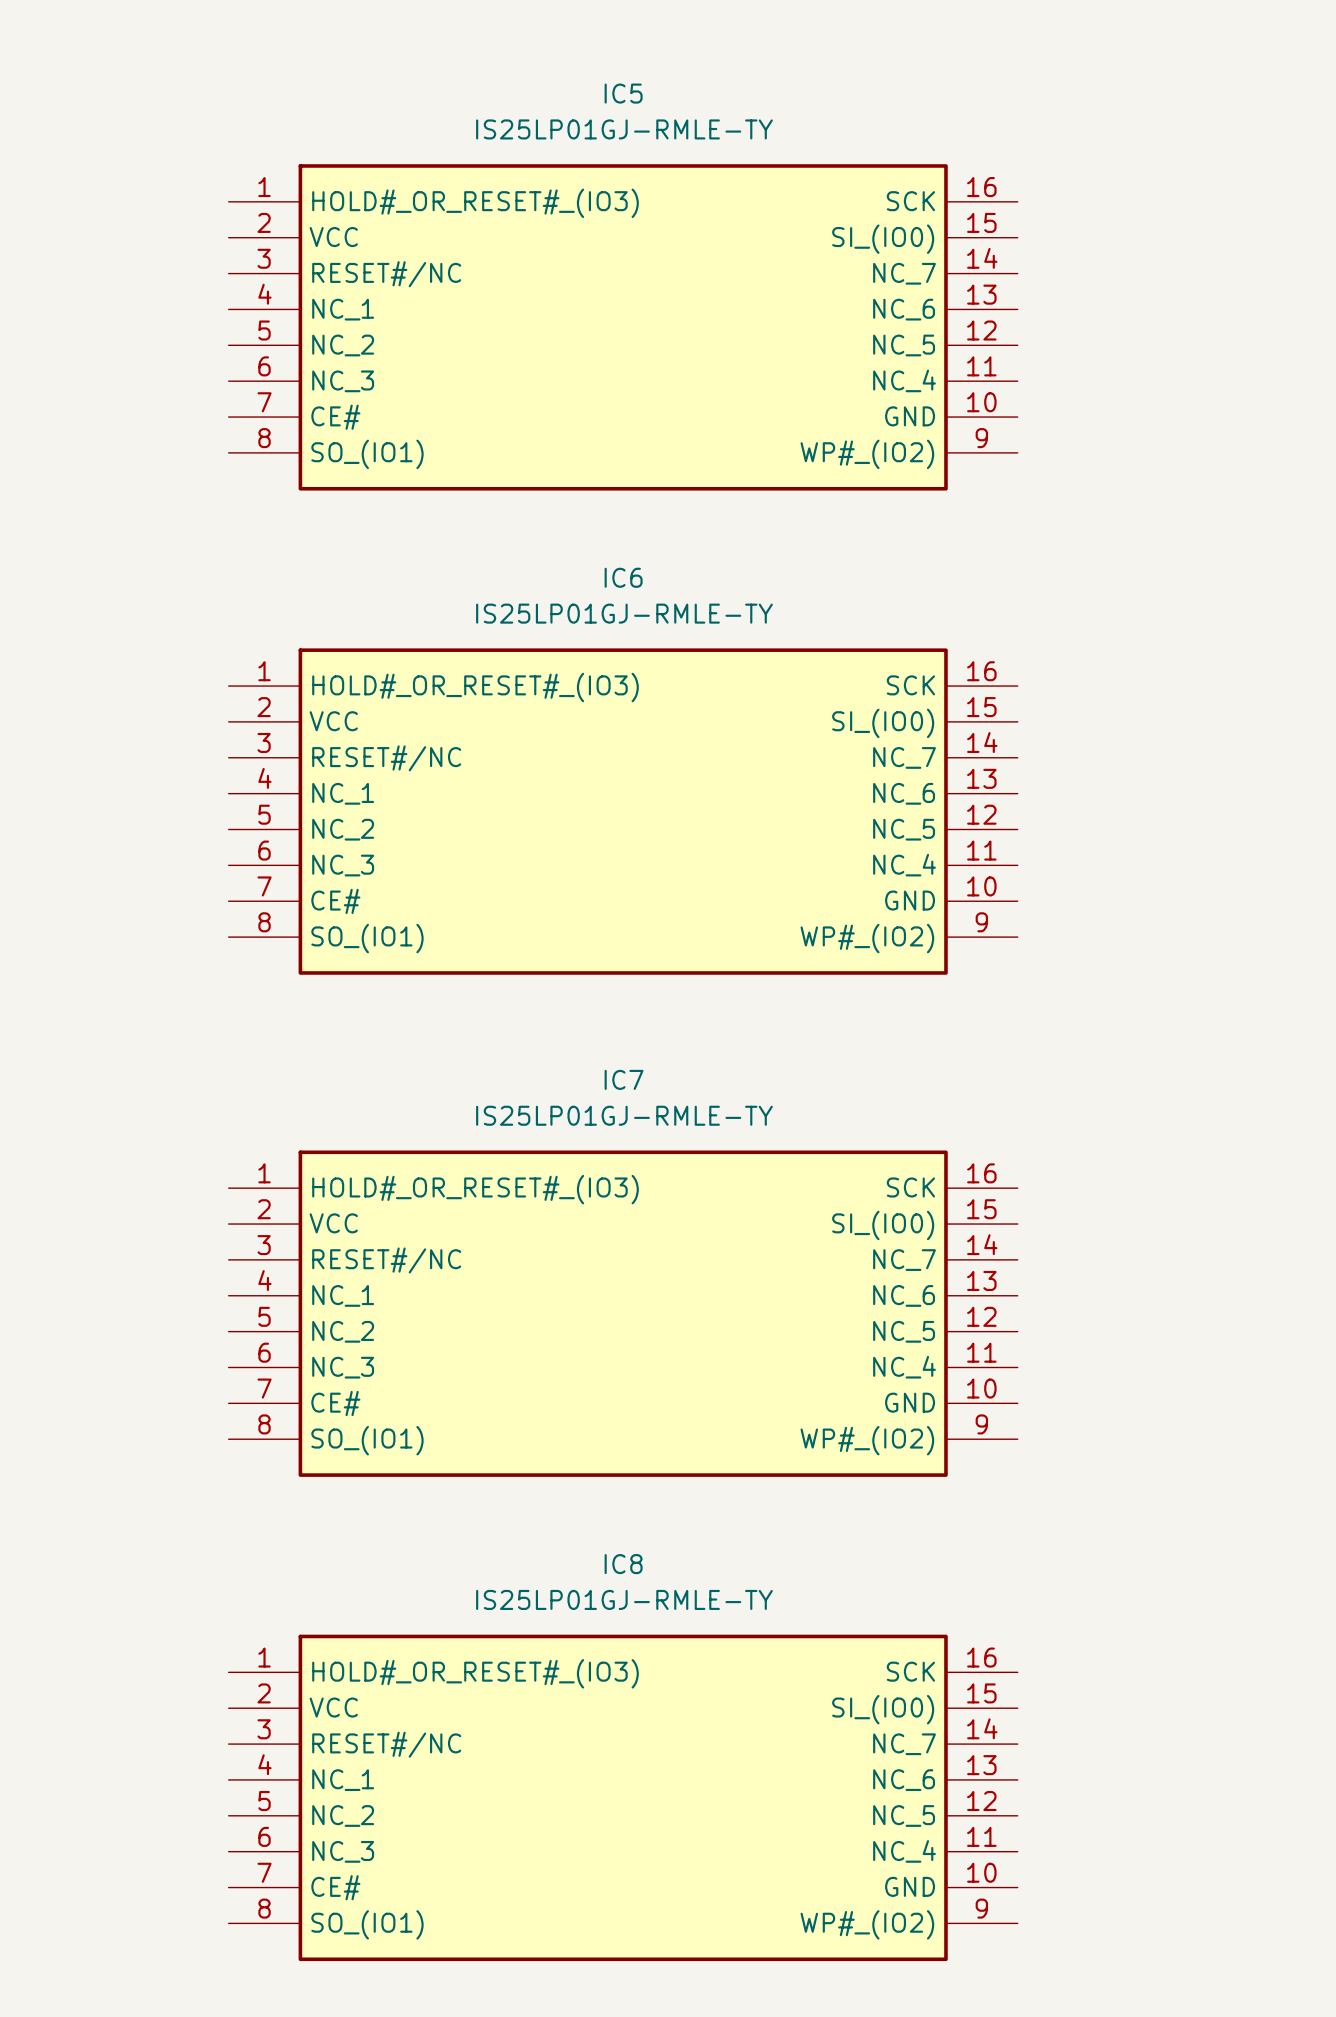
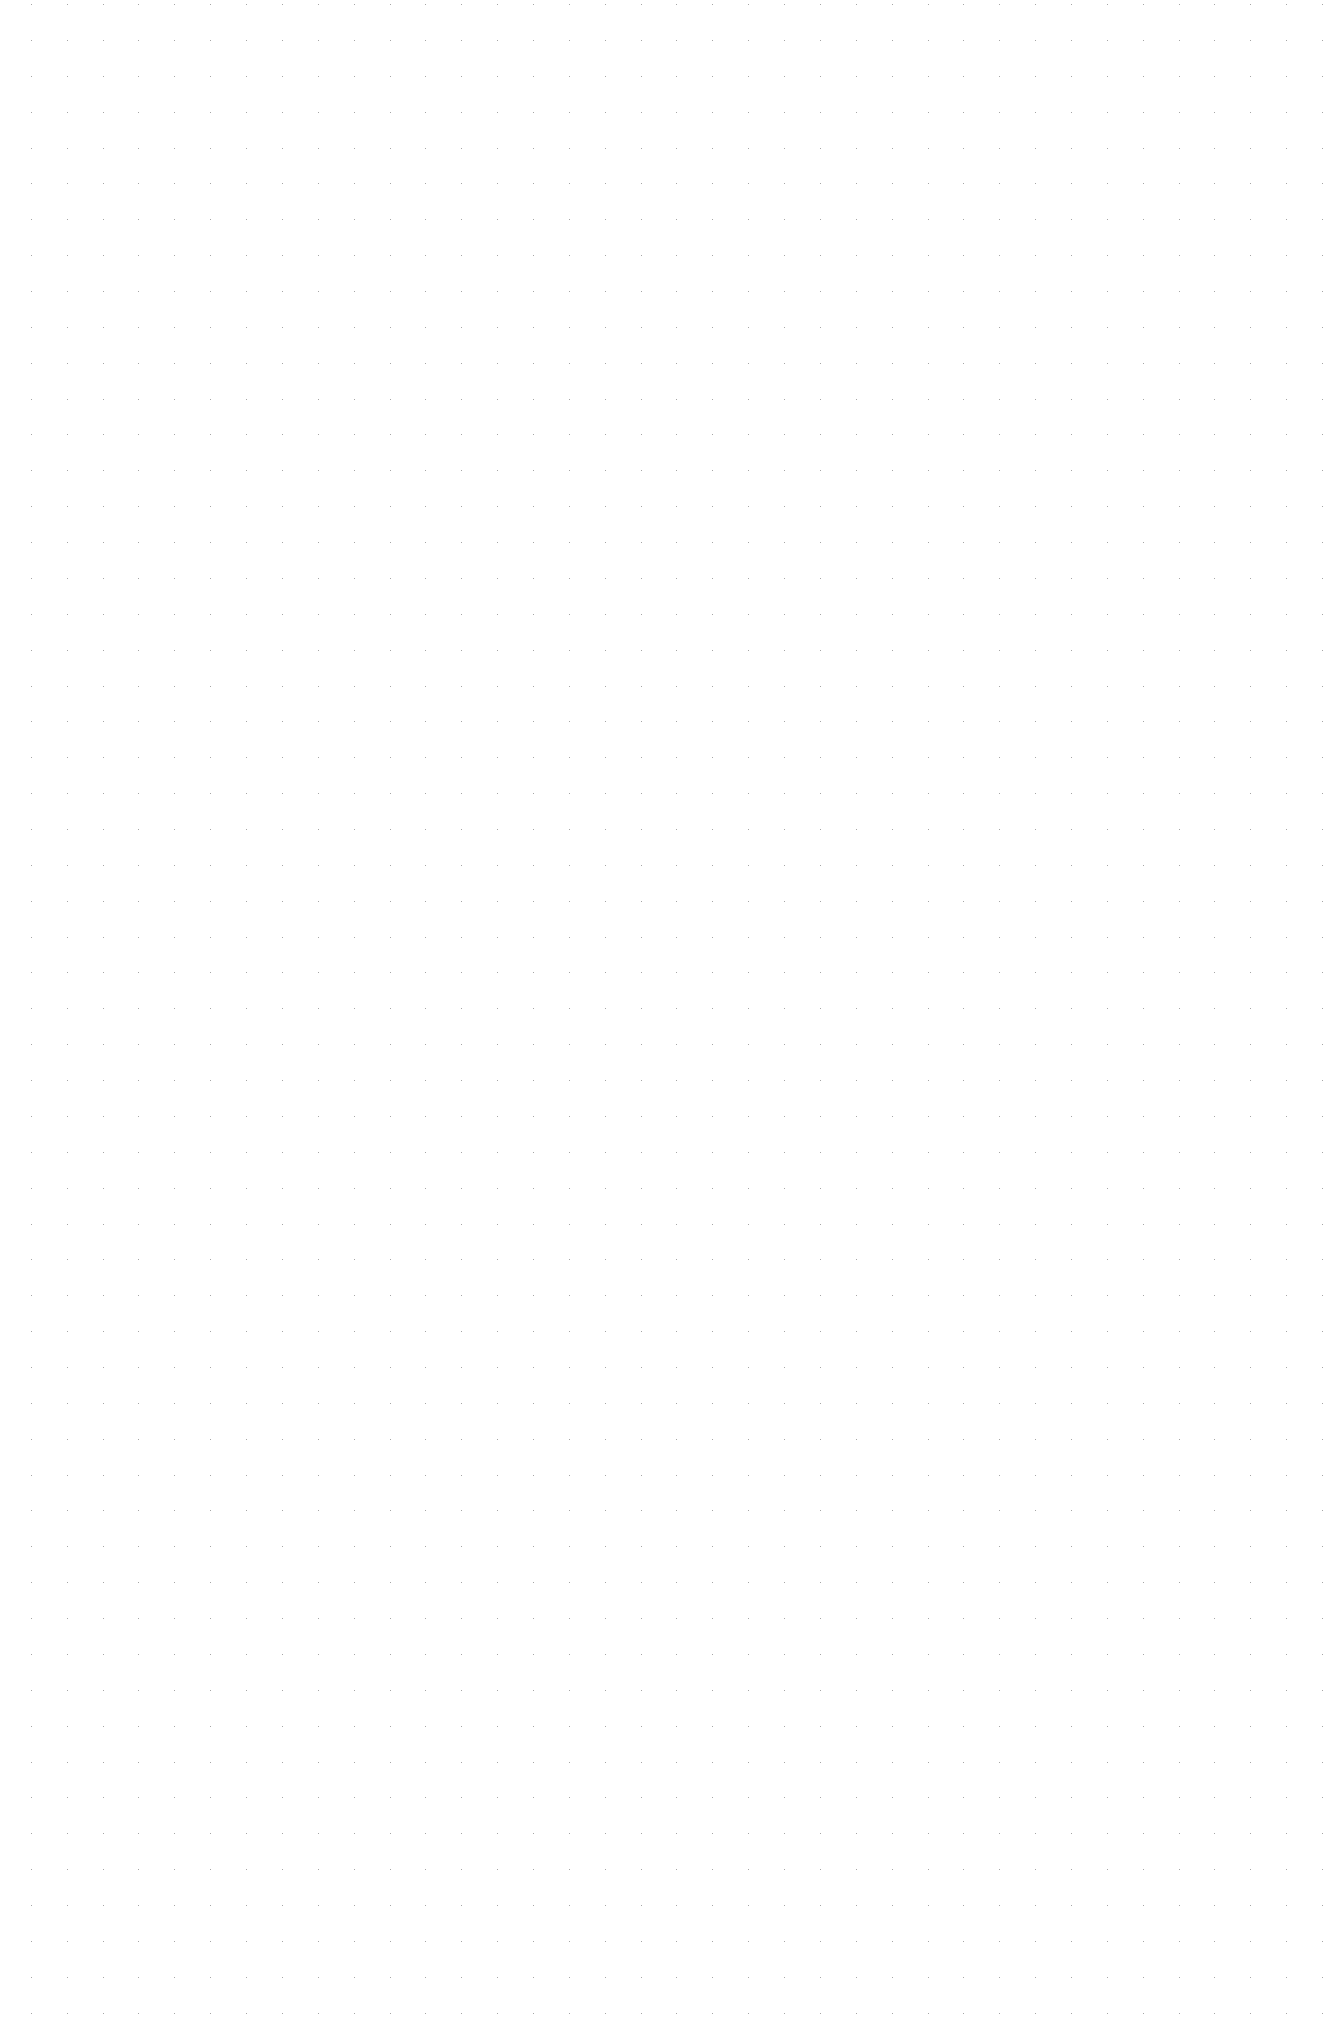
IC5: IS25LP01GJ-RMLE-TY (623, 327) -> none
IC6: IS25LP01GJ-RMLE-TY (623, 811) -> none
IC7: IS25LP01GJ-RMLE-TY (623, 1313) -> none
IC8: IS25LP01GJ-RMLE-TY (623, 1797) -> none

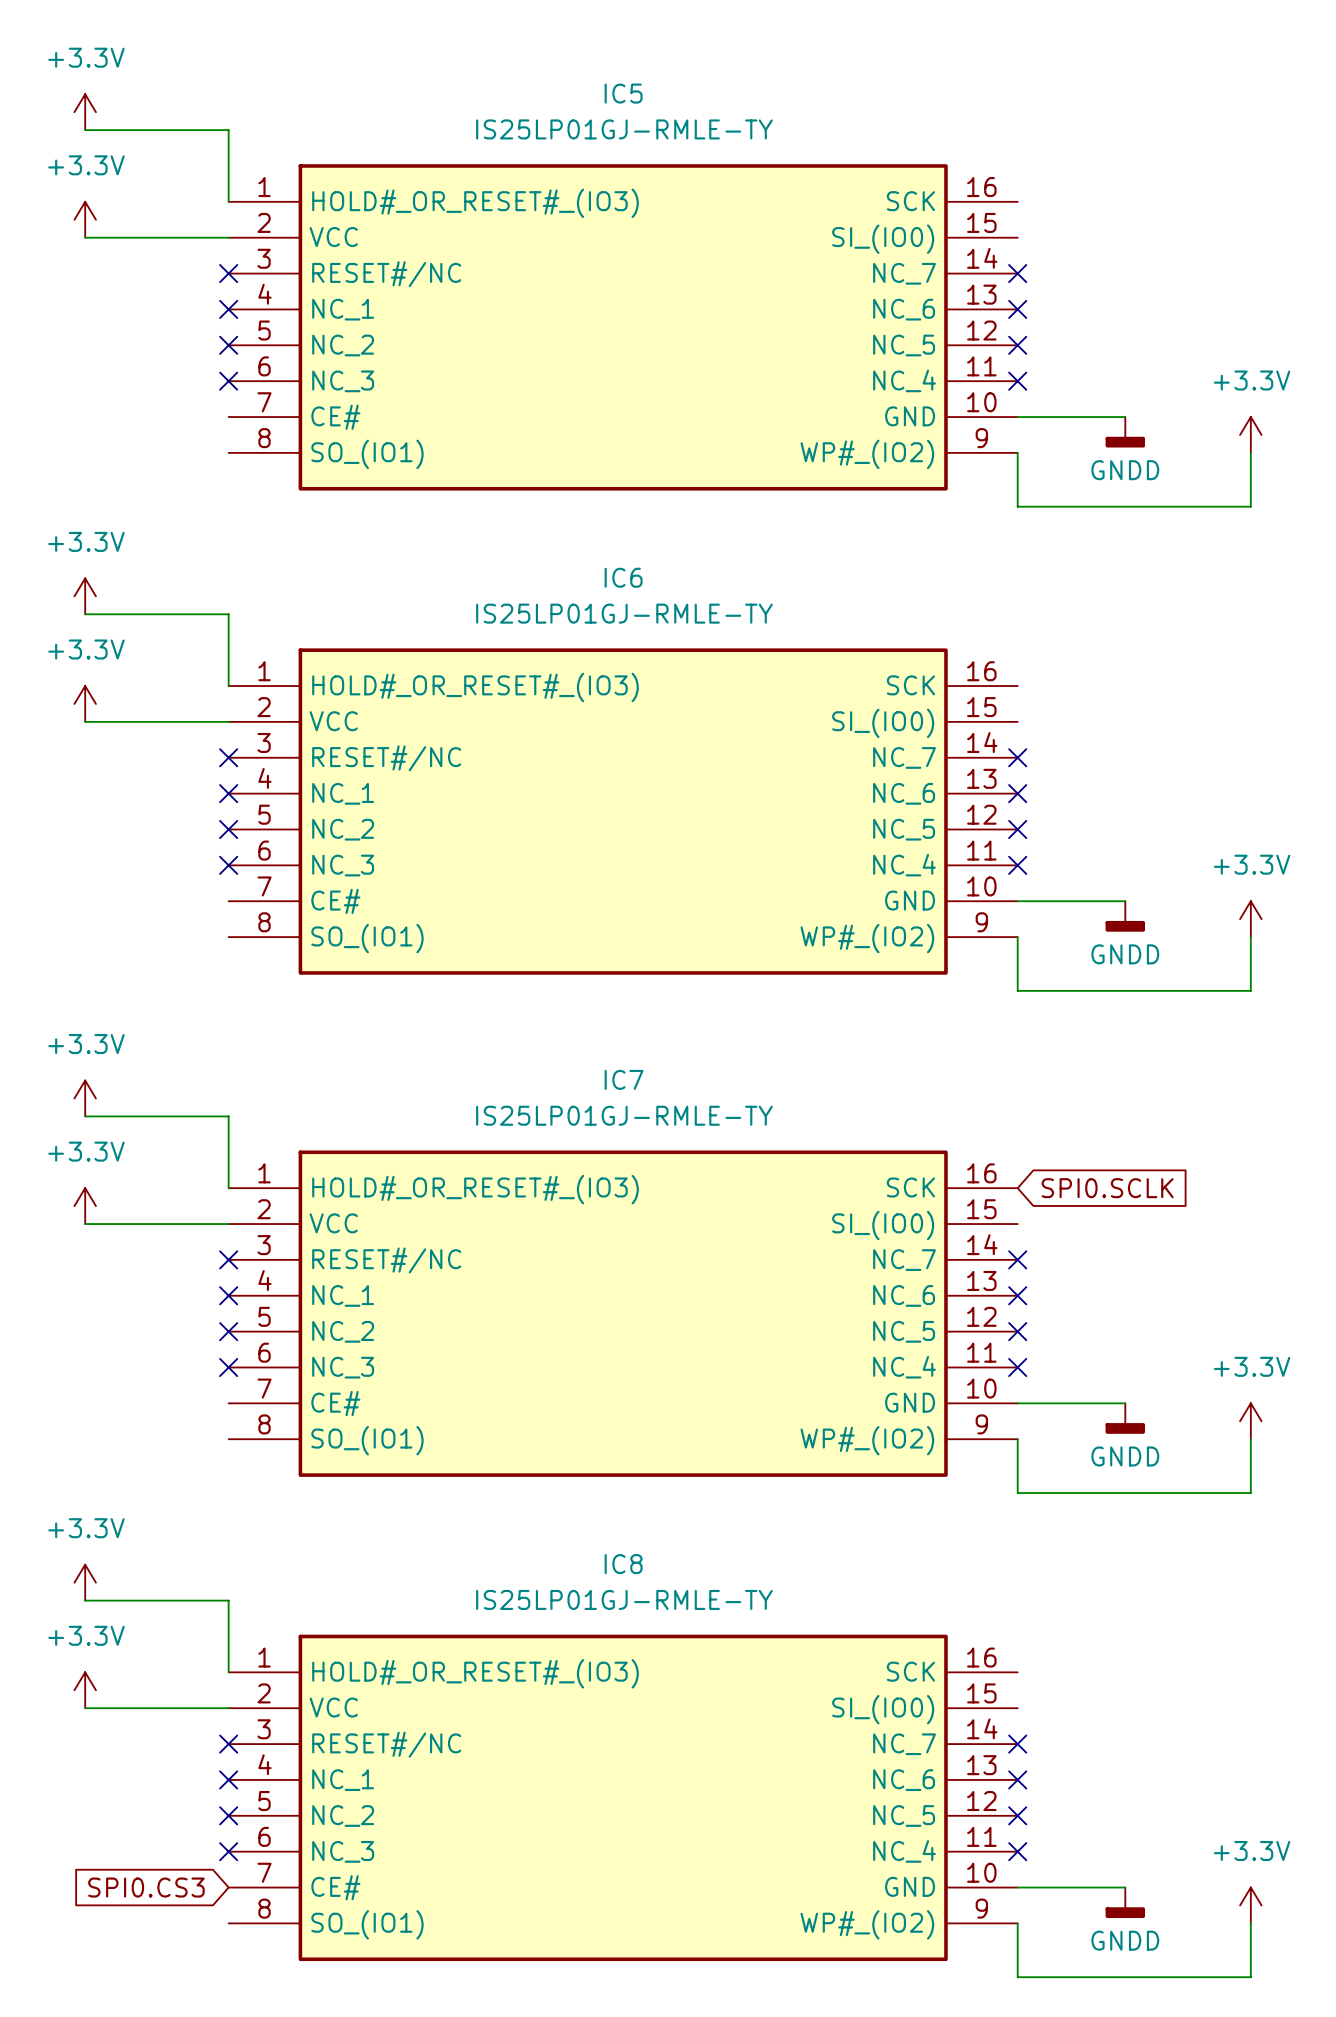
power symbol: none -> +3.3V (85, 112)
wire: none -> (85, 130) (228, 130) (228, 201)
power symbol: none -> +3.3V (85, 219)
wire: none -> (85, 237) (228, 237)
no-connect mark: none -> (228, 273)
no-connect mark: none -> (1017, 273)
no-connect mark: none -> (228, 309)
no-connect mark: none -> (1017, 309)
IC5: none -> IS25LP01GJ-RMLE-TY (623, 327)
no-connect mark: none -> (228, 345)
no-connect mark: none -> (1017, 345)
no-connect mark: none -> (228, 381)
no-connect mark: none -> (1017, 381)
wire: none -> (1017, 417) (1125, 417)
power symbol: none -> GNDD (1125, 432)
power symbol: none -> +3.3V (1250, 434)
wire: none -> (1017, 452) (1017, 506) (1250, 506) (1250, 452)
power symbol: none -> +3.3V (85, 596)
wire: none -> (85, 614) (228, 614) (228, 686)
power symbol: none -> +3.3V (85, 703)
wire: none -> (85, 721) (228, 721)
no-connect mark: none -> (228, 757)
no-connect mark: none -> (1017, 757)
no-connect mark: none -> (228, 793)
no-connect mark: none -> (1017, 793)
IC6: none -> IS25LP01GJ-RMLE-TY (623, 811)
no-connect mark: none -> (228, 829)
no-connect mark: none -> (1017, 829)
no-connect mark: none -> (228, 865)
no-connect mark: none -> (1017, 865)
wire: none -> (1017, 901) (1125, 901)
power symbol: none -> GNDD (1125, 916)
power symbol: none -> +3.3V (1250, 919)
wire: none -> (1017, 937) (1017, 990) (1250, 990) (1250, 937)
power symbol: none -> +3.3V (85, 1098)
wire: none -> (85, 1116) (228, 1116) (228, 1188)
global label: none -> SPI0.SCLK (1107, 1188)
power symbol: none -> +3.3V (85, 1206)
wire: none -> (85, 1224) (228, 1224)
no-connect mark: none -> (228, 1259)
no-connect mark: none -> (1017, 1259)
no-connect mark: none -> (228, 1295)
no-connect mark: none -> (1017, 1295)
IC7: none -> IS25LP01GJ-RMLE-TY (623, 1313)
no-connect mark: none -> (228, 1331)
no-connect mark: none -> (1017, 1331)
no-connect mark: none -> (228, 1367)
no-connect mark: none -> (1017, 1367)
wire: none -> (1017, 1403) (1125, 1403)
power symbol: none -> GNDD (1125, 1418)
power symbol: none -> +3.3V (1250, 1421)
wire: none -> (1017, 1439) (1017, 1493) (1250, 1493) (1250, 1439)
power symbol: none -> +3.3V (85, 1582)
wire: none -> (85, 1600) (228, 1600) (228, 1672)
power symbol: none -> +3.3V (85, 1690)
wire: none -> (85, 1708) (228, 1708)
no-connect mark: none -> (228, 1744)
no-connect mark: none -> (1017, 1744)
no-connect mark: none -> (228, 1779)
no-connect mark: none -> (1017, 1779)
IC8: none -> IS25LP01GJ-RMLE-TY (623, 1797)
no-connect mark: none -> (228, 1815)
no-connect mark: none -> (1017, 1815)
no-connect mark: none -> (228, 1851)
no-connect mark: none -> (1017, 1851)
global label: none -> SPI0.CS3 (146, 1887)
wire: none -> (1017, 1887) (1125, 1887)
power symbol: none -> GNDD (1125, 1902)
power symbol: none -> +3.3V (1250, 1905)
wire: none -> (1017, 1923) (1017, 1977) (1250, 1977) (1250, 1923)

